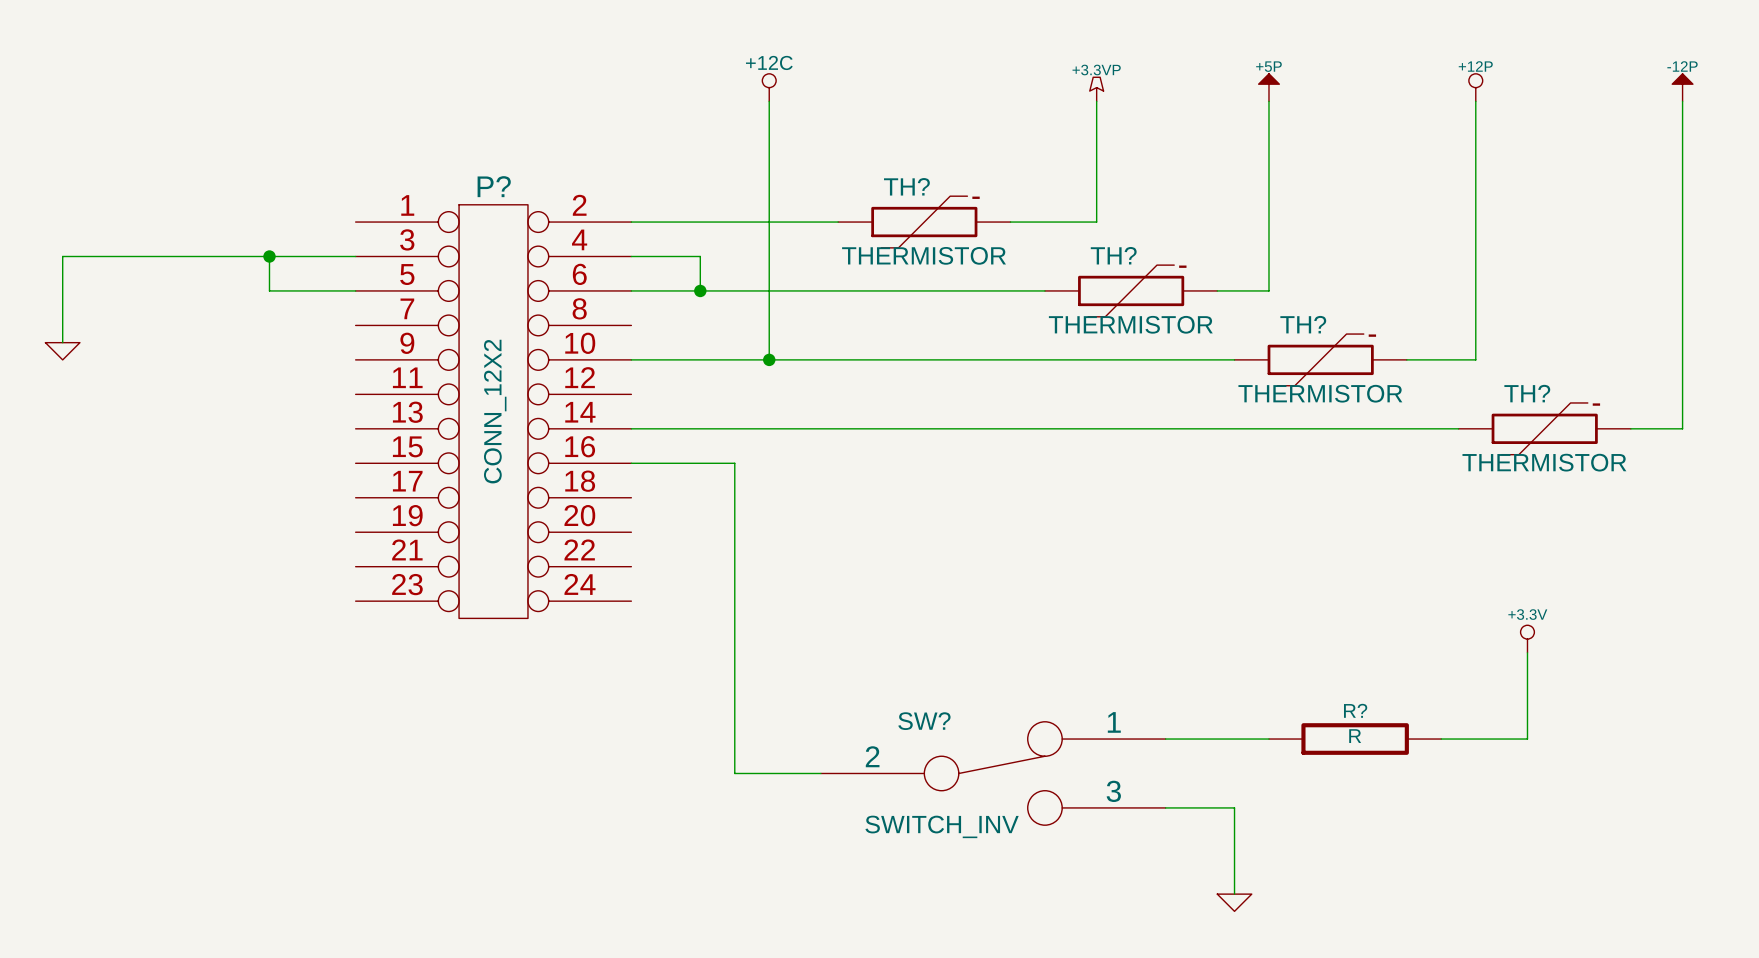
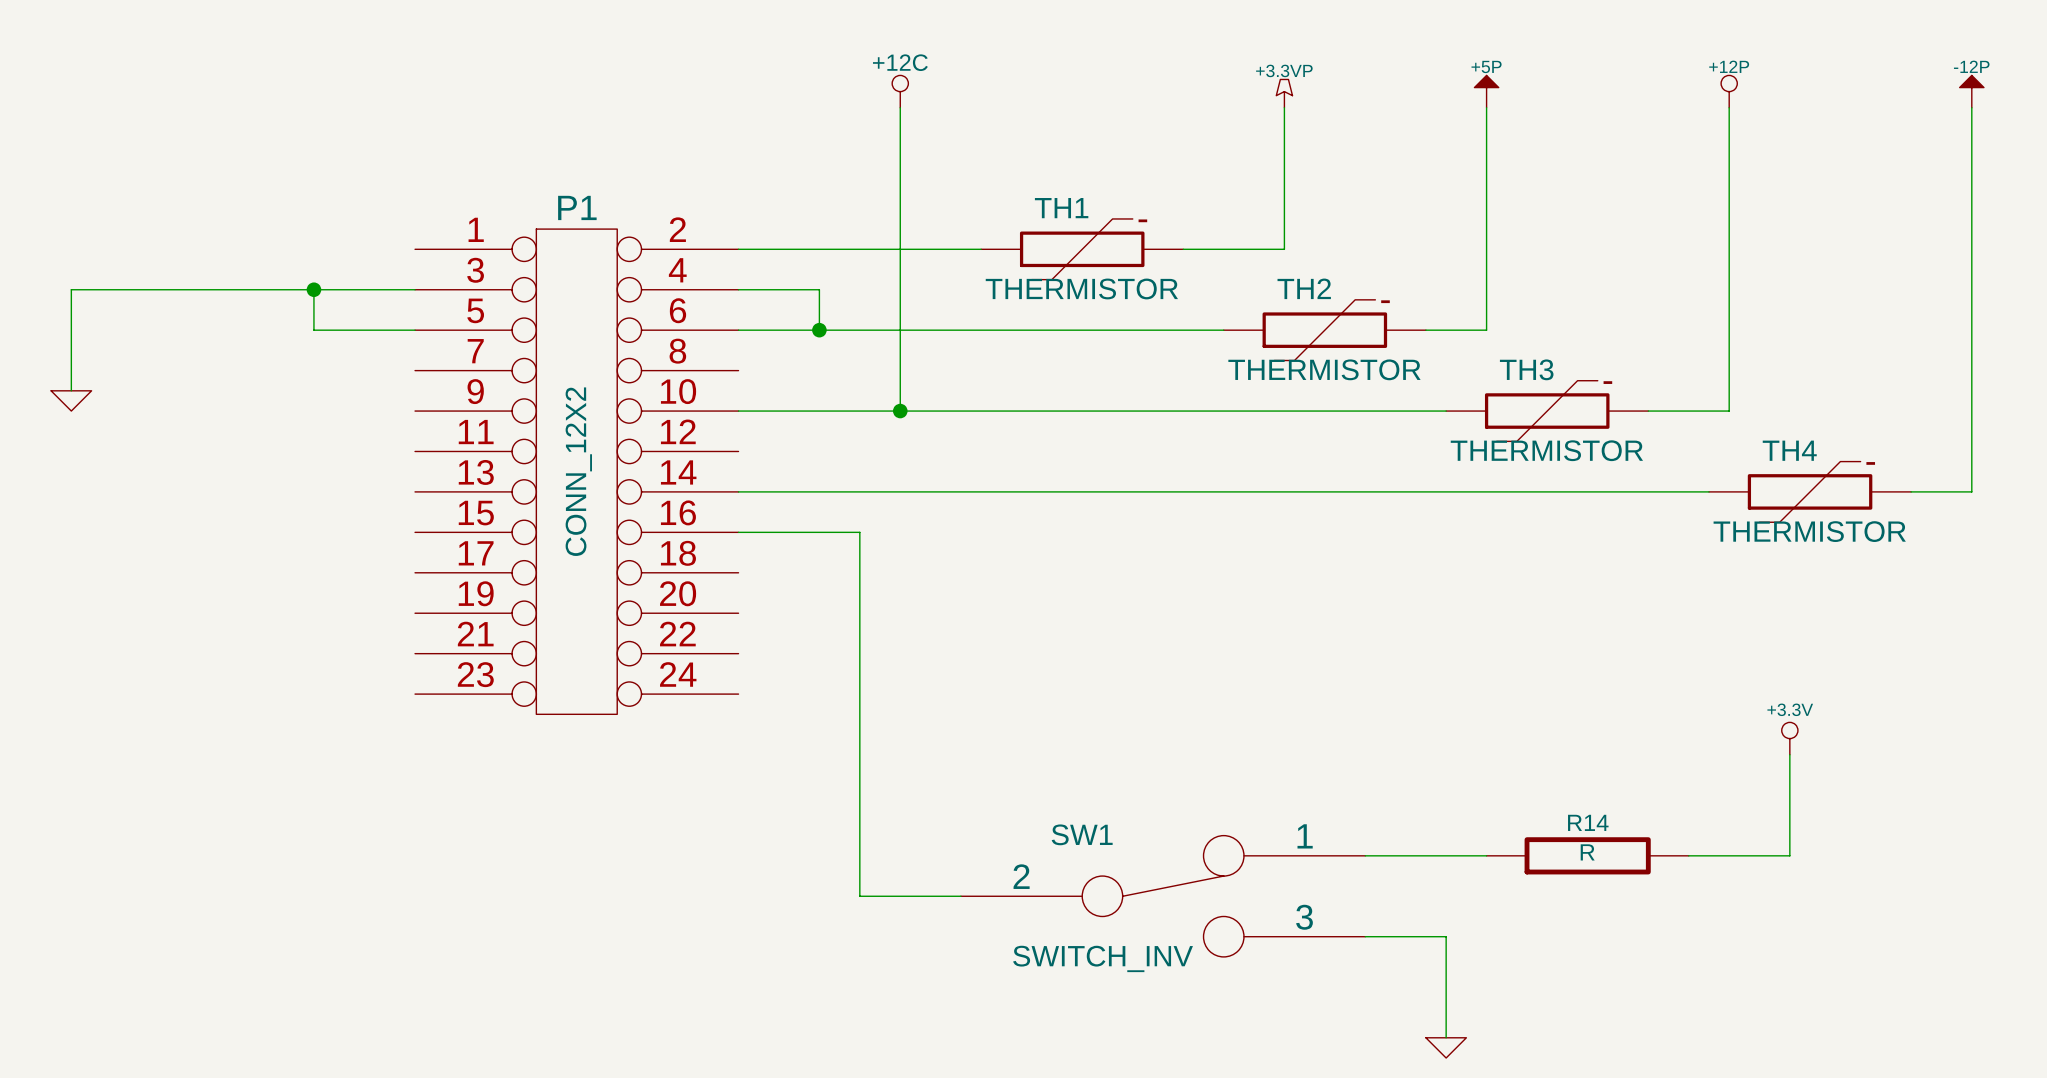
P? name: P? (494, 186) -> P1 (577, 207)
TH? name: TH? (906, 186) -> TH1 (1061, 208)
TH? name: TH? (1113, 255) -> TH2 (1304, 288)
TH? name: TH? (1303, 324) -> TH3 (1526, 369)
TH? name: TH? (1527, 393) -> TH4 (1789, 450)
R? name: R? (1355, 710) -> R14 (1588, 822)
SW? name: SW? (924, 721) -> SW1 (1082, 834)

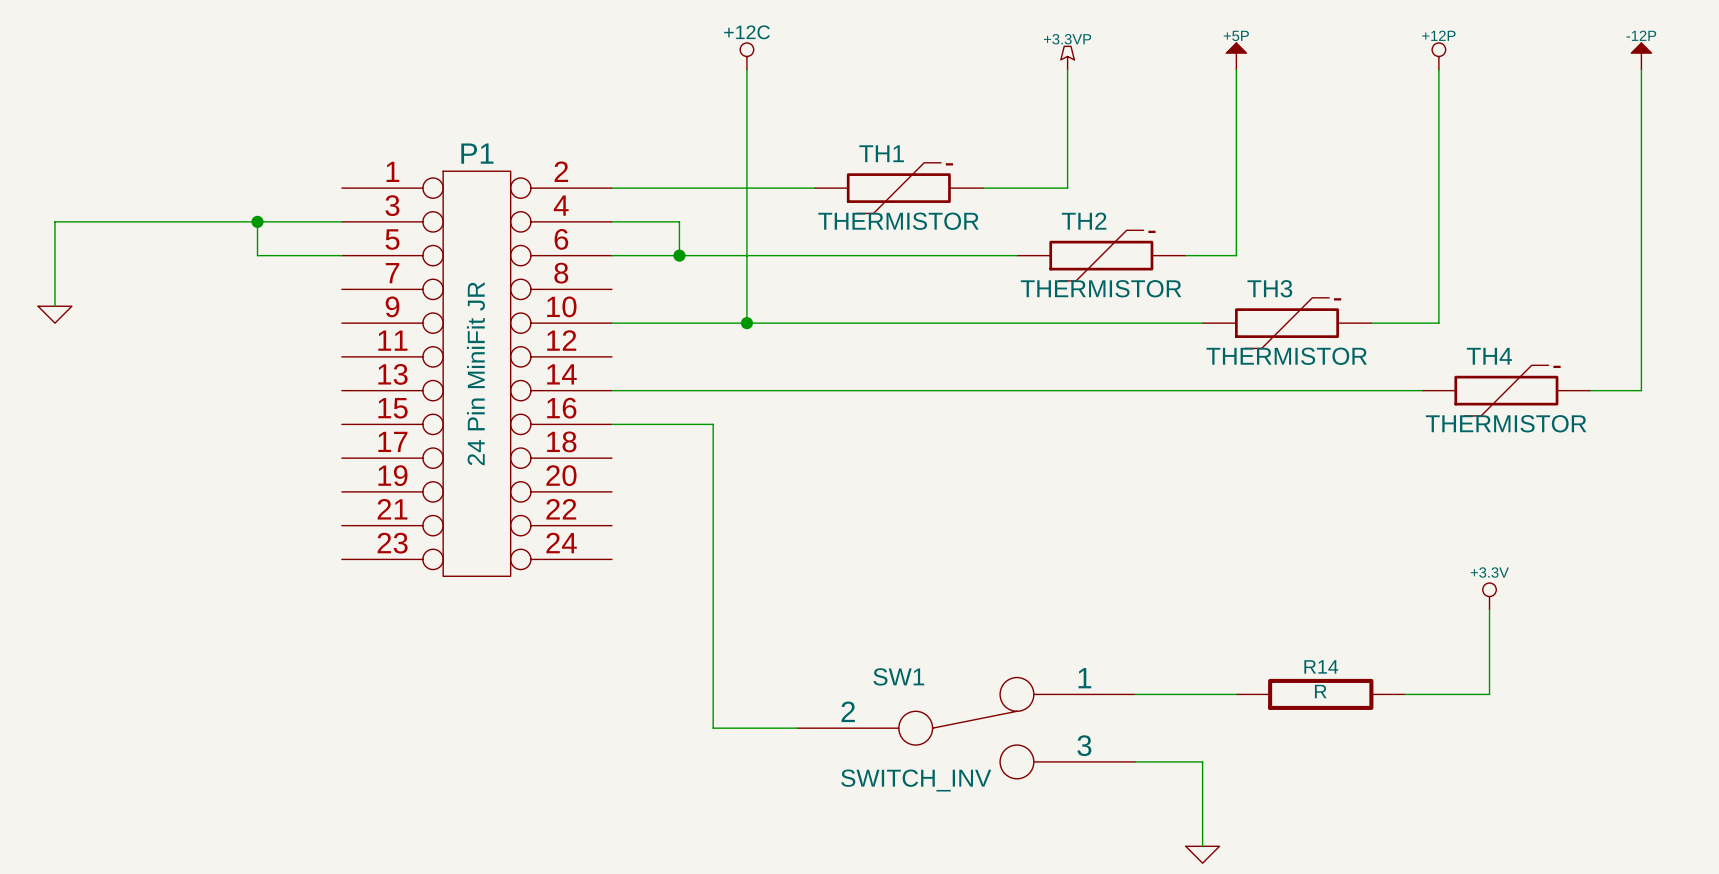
P1 value: CONN_12X2 (578, 471) -> 24 Pin MiniFit JR (475, 373)

